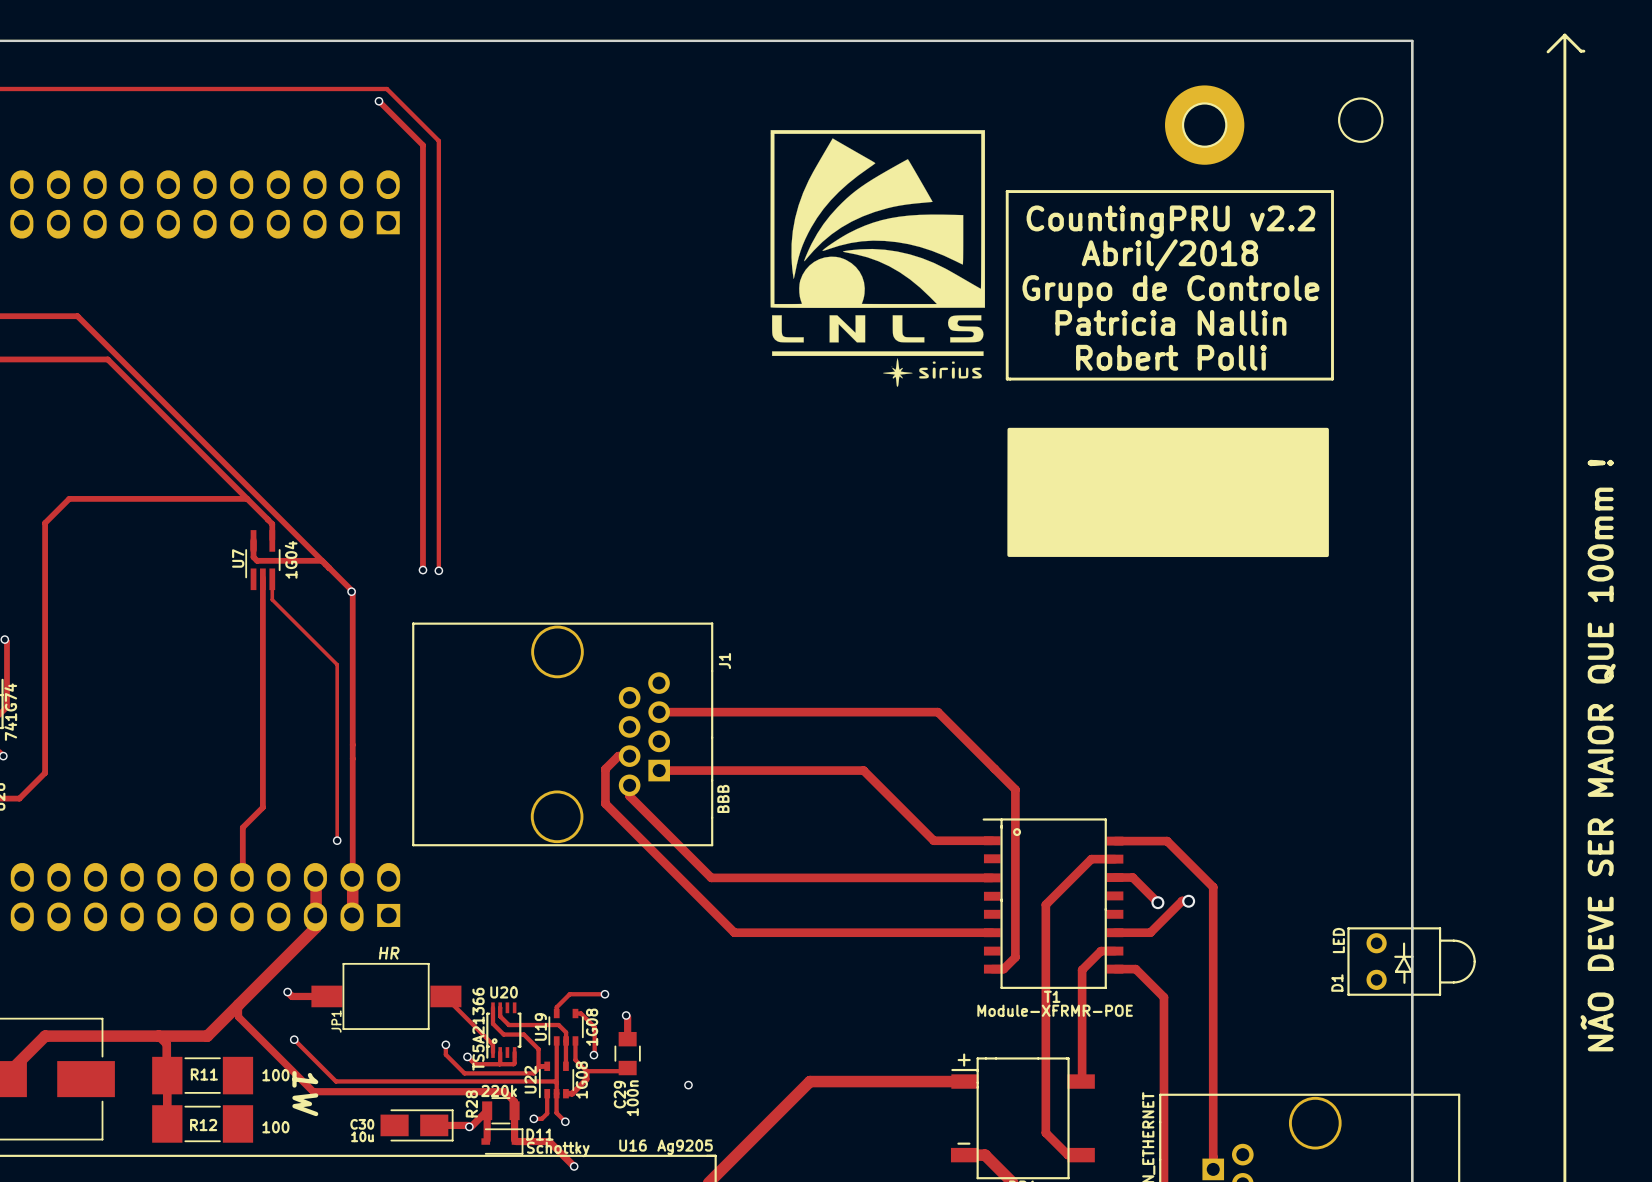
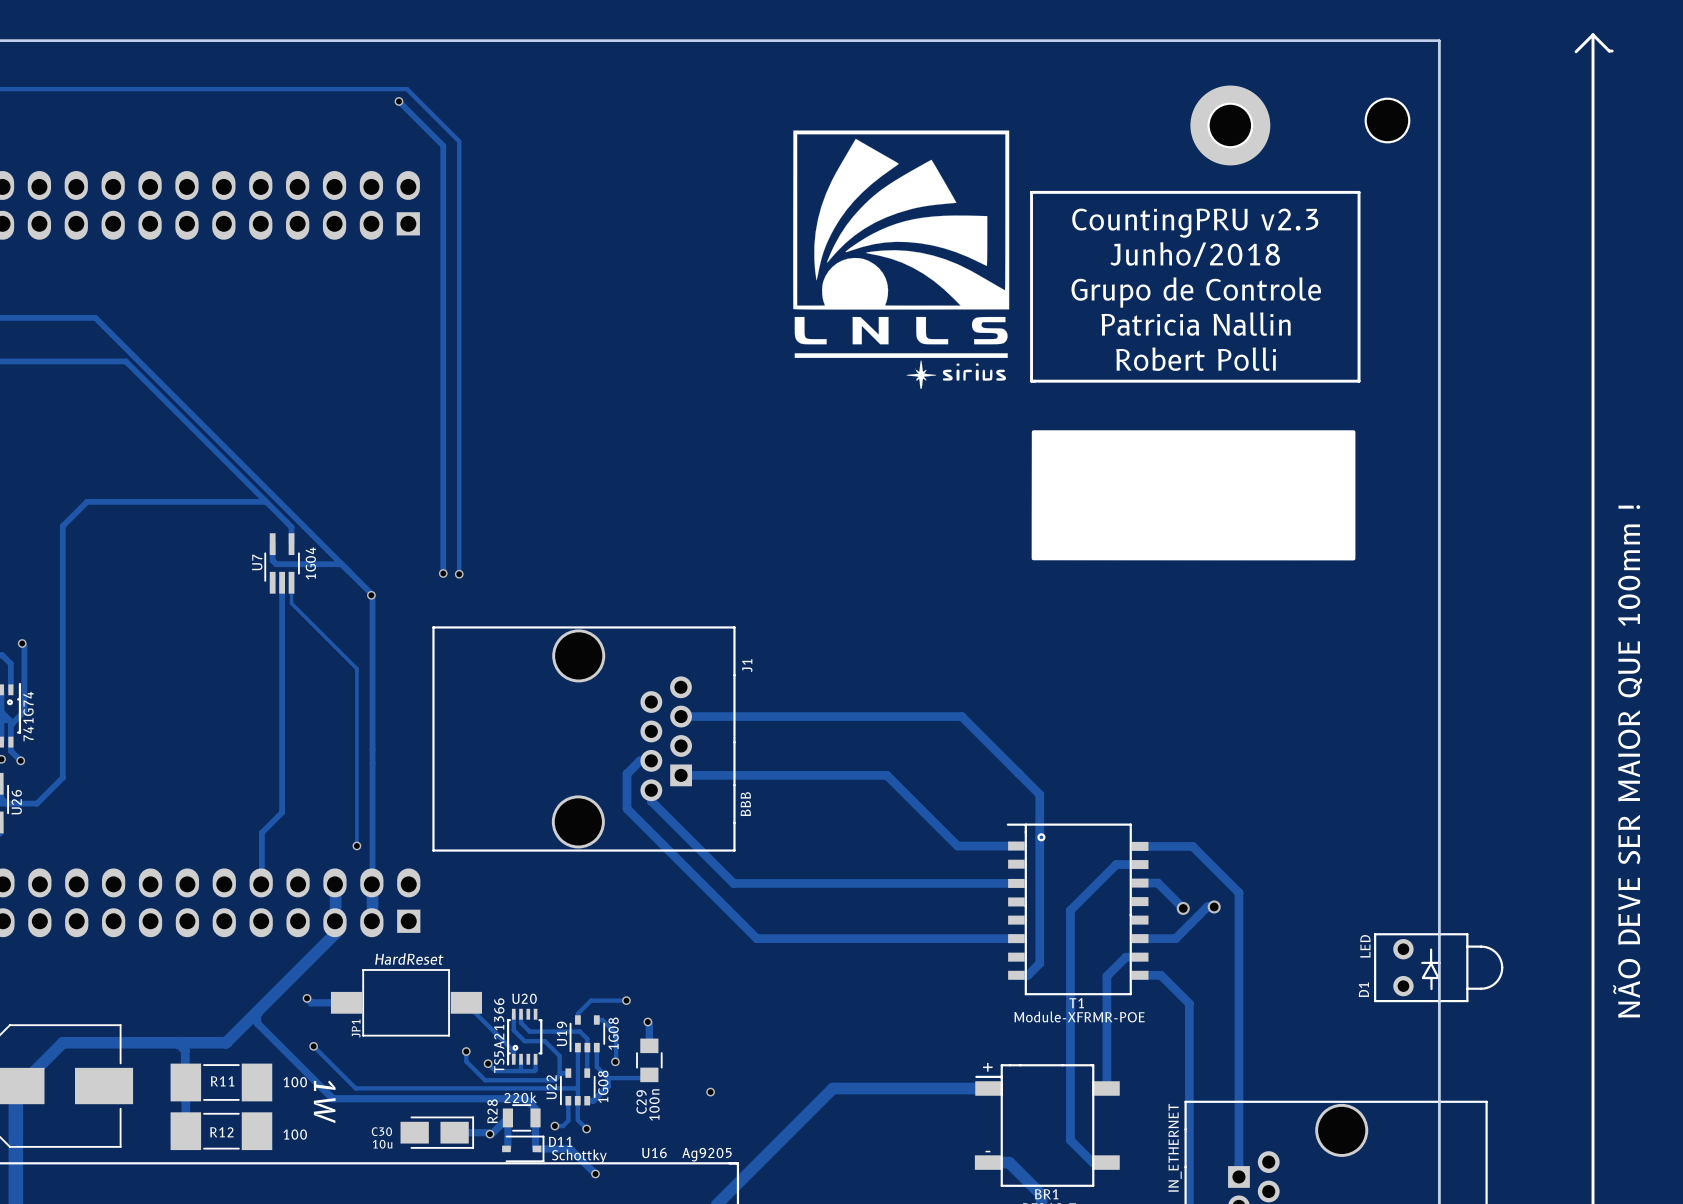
text: CountingPRU v2.2 (1170, 222) -> CountingPRU v2.3 (1195, 223)
text: Abril/2018 (1169, 255) -> Junho/2018 (1195, 254)
JP1 value: HR (389, 953) -> HardReset (409, 958)

